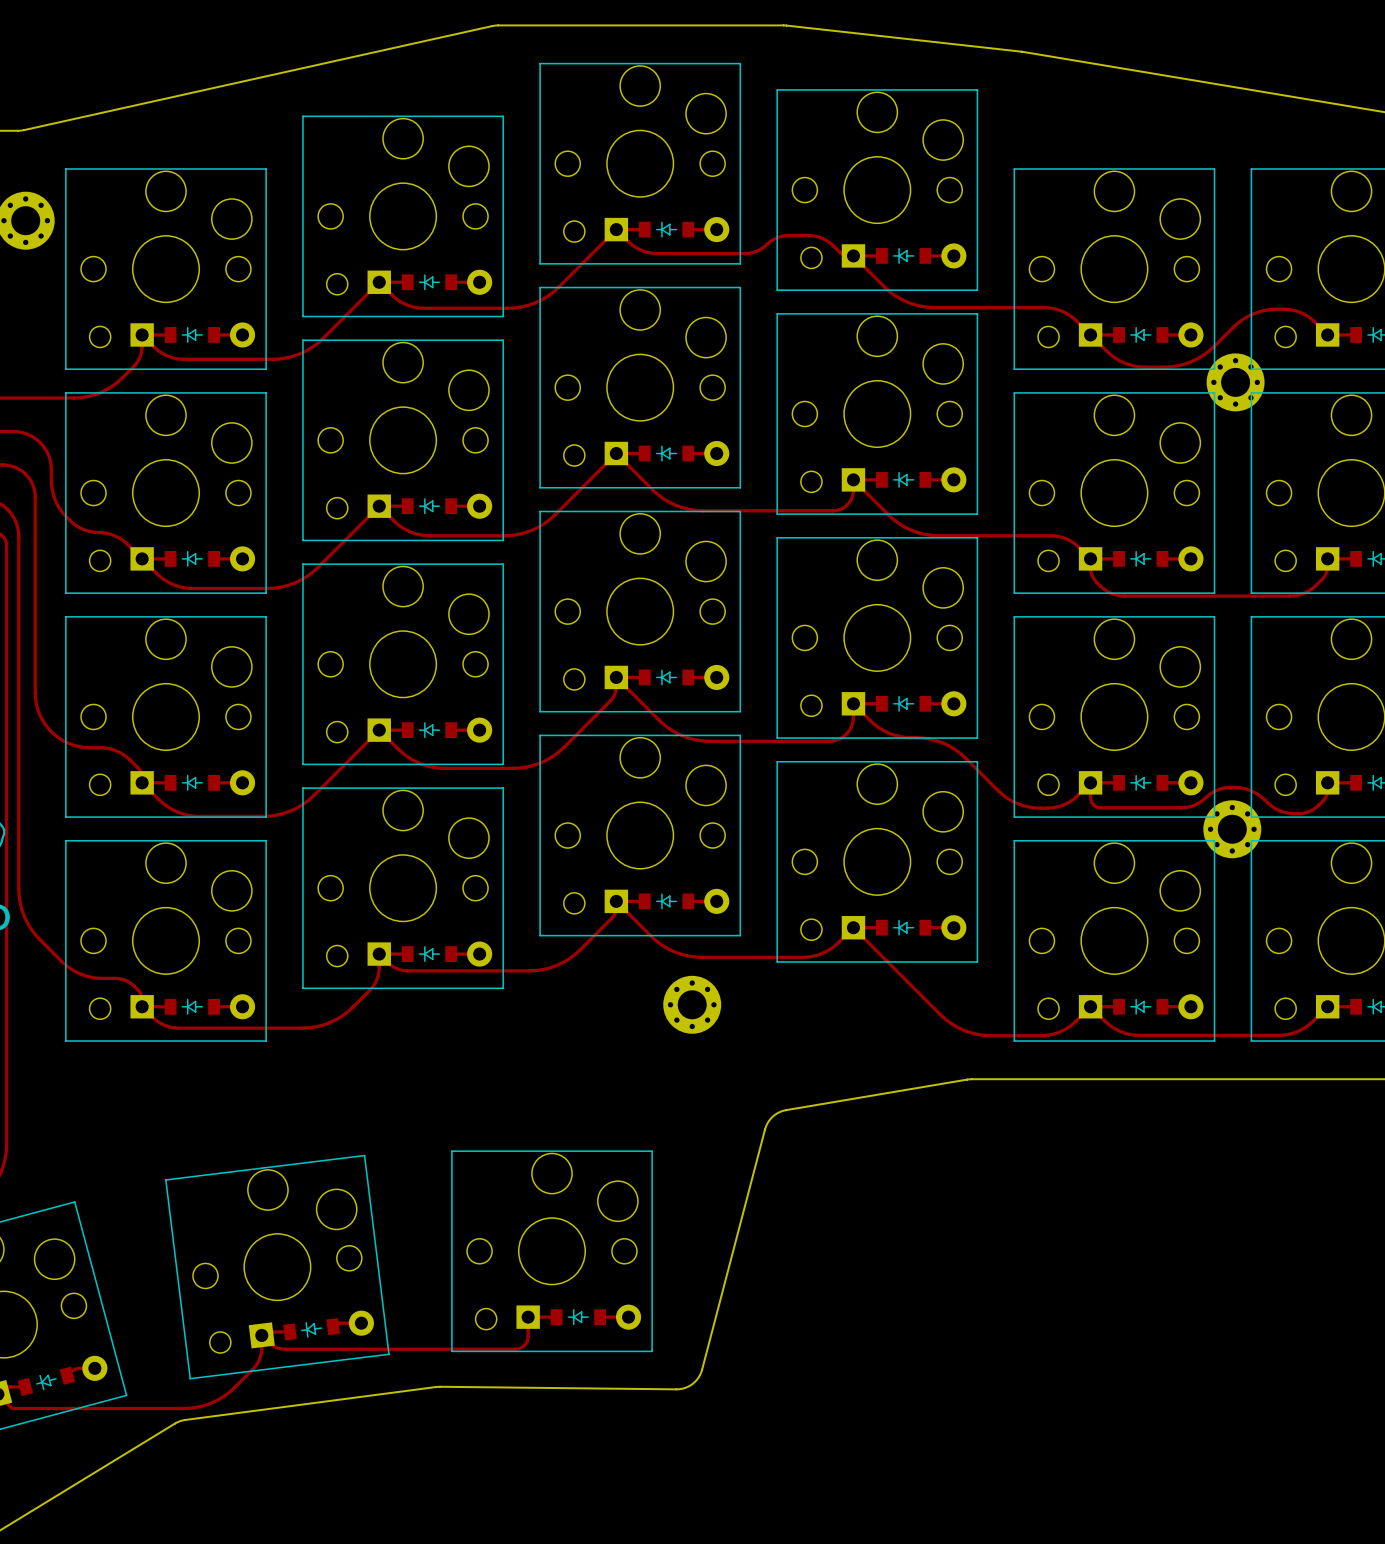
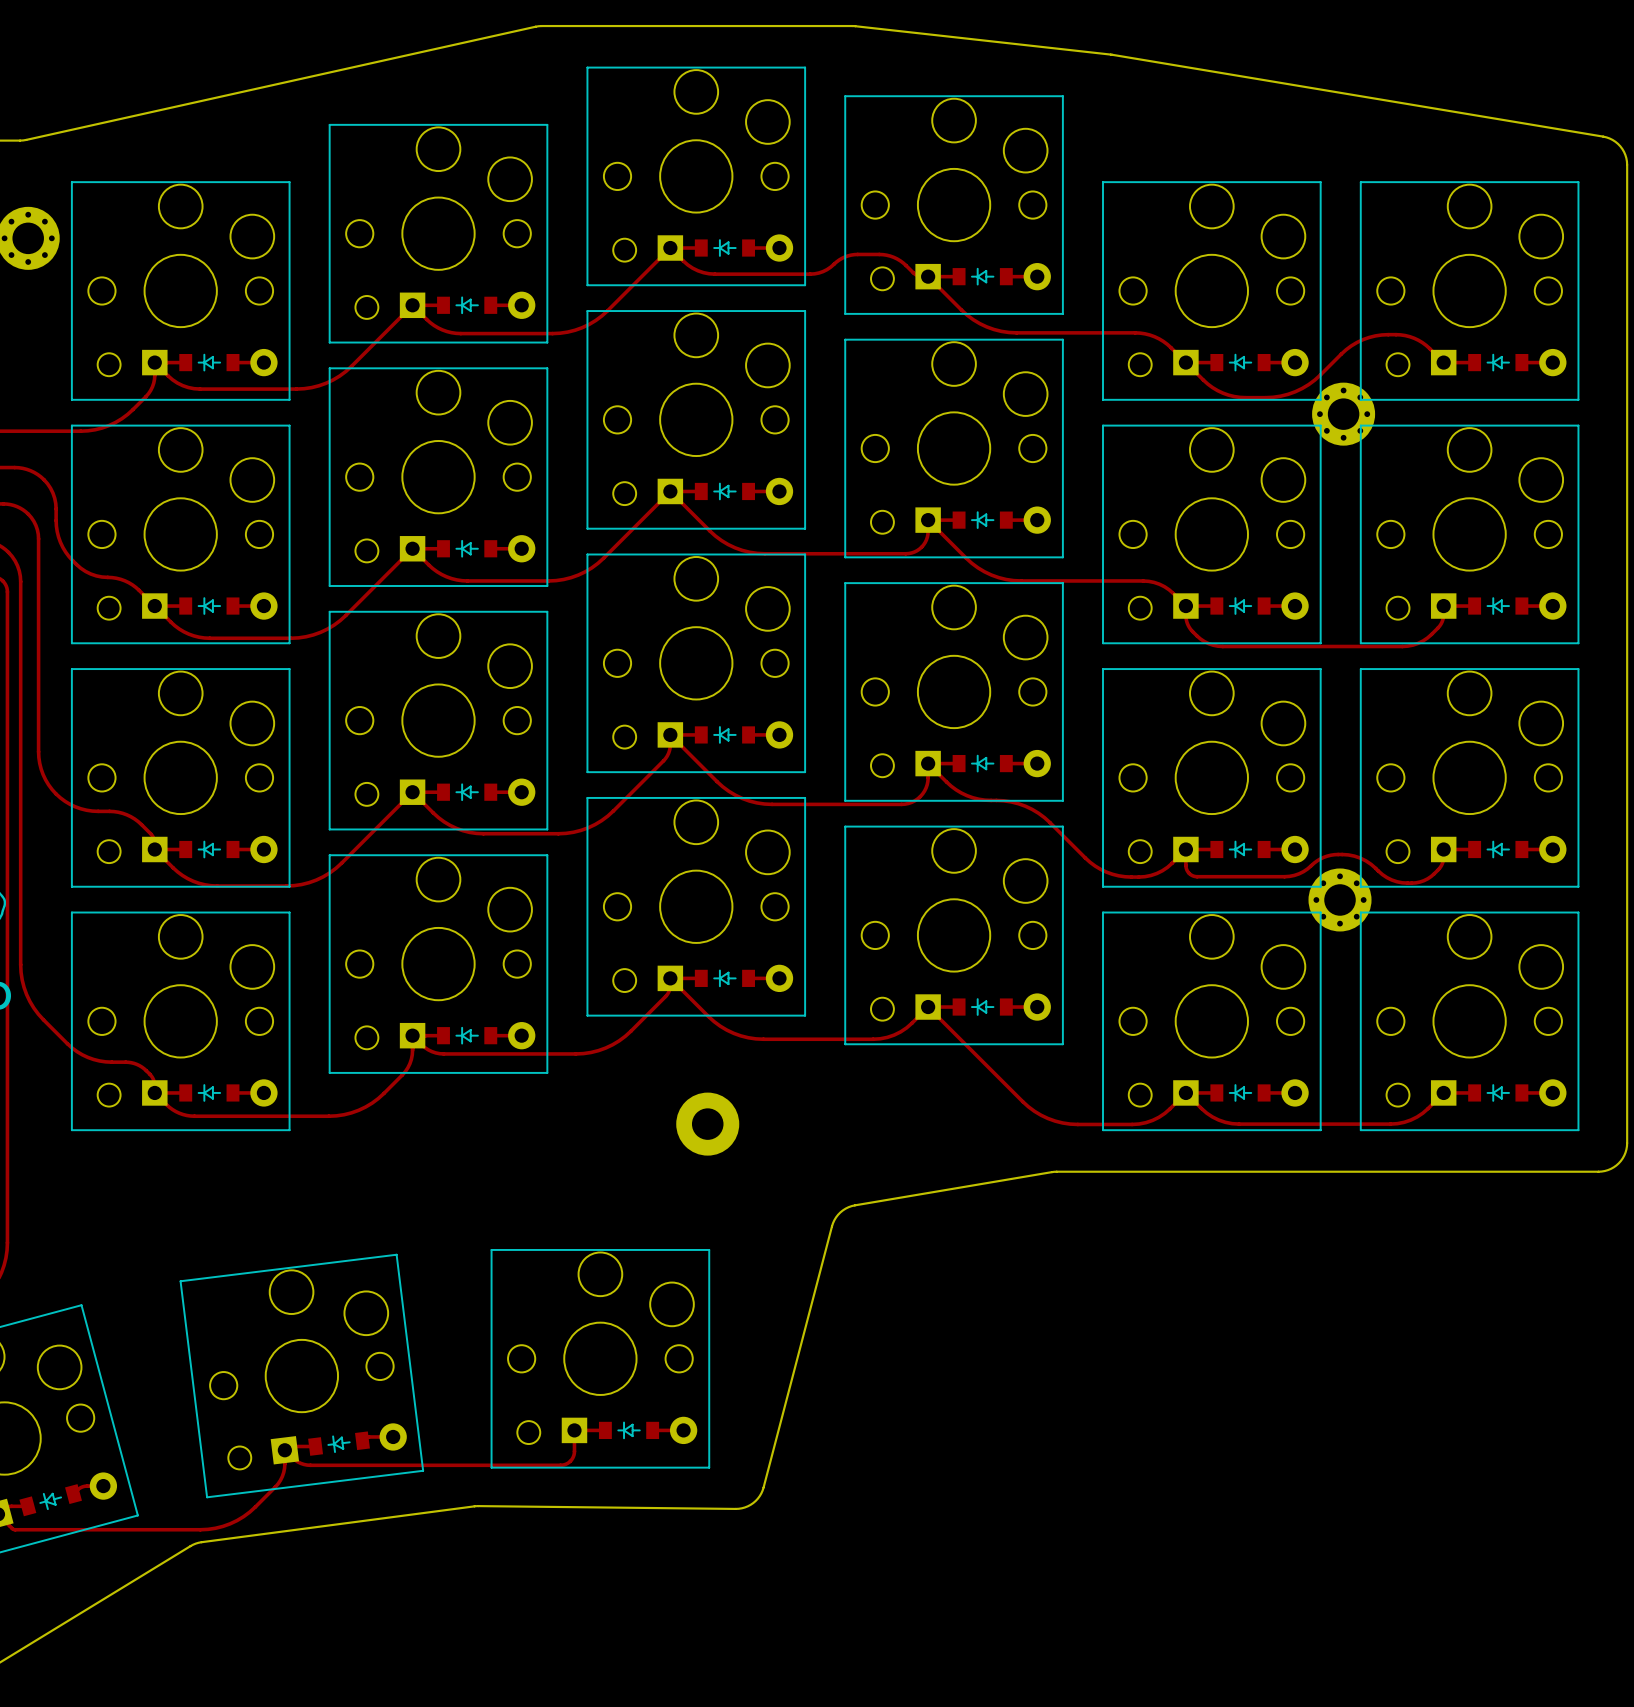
part: (692, 1004) -> none
part: none -> (707, 1124)

